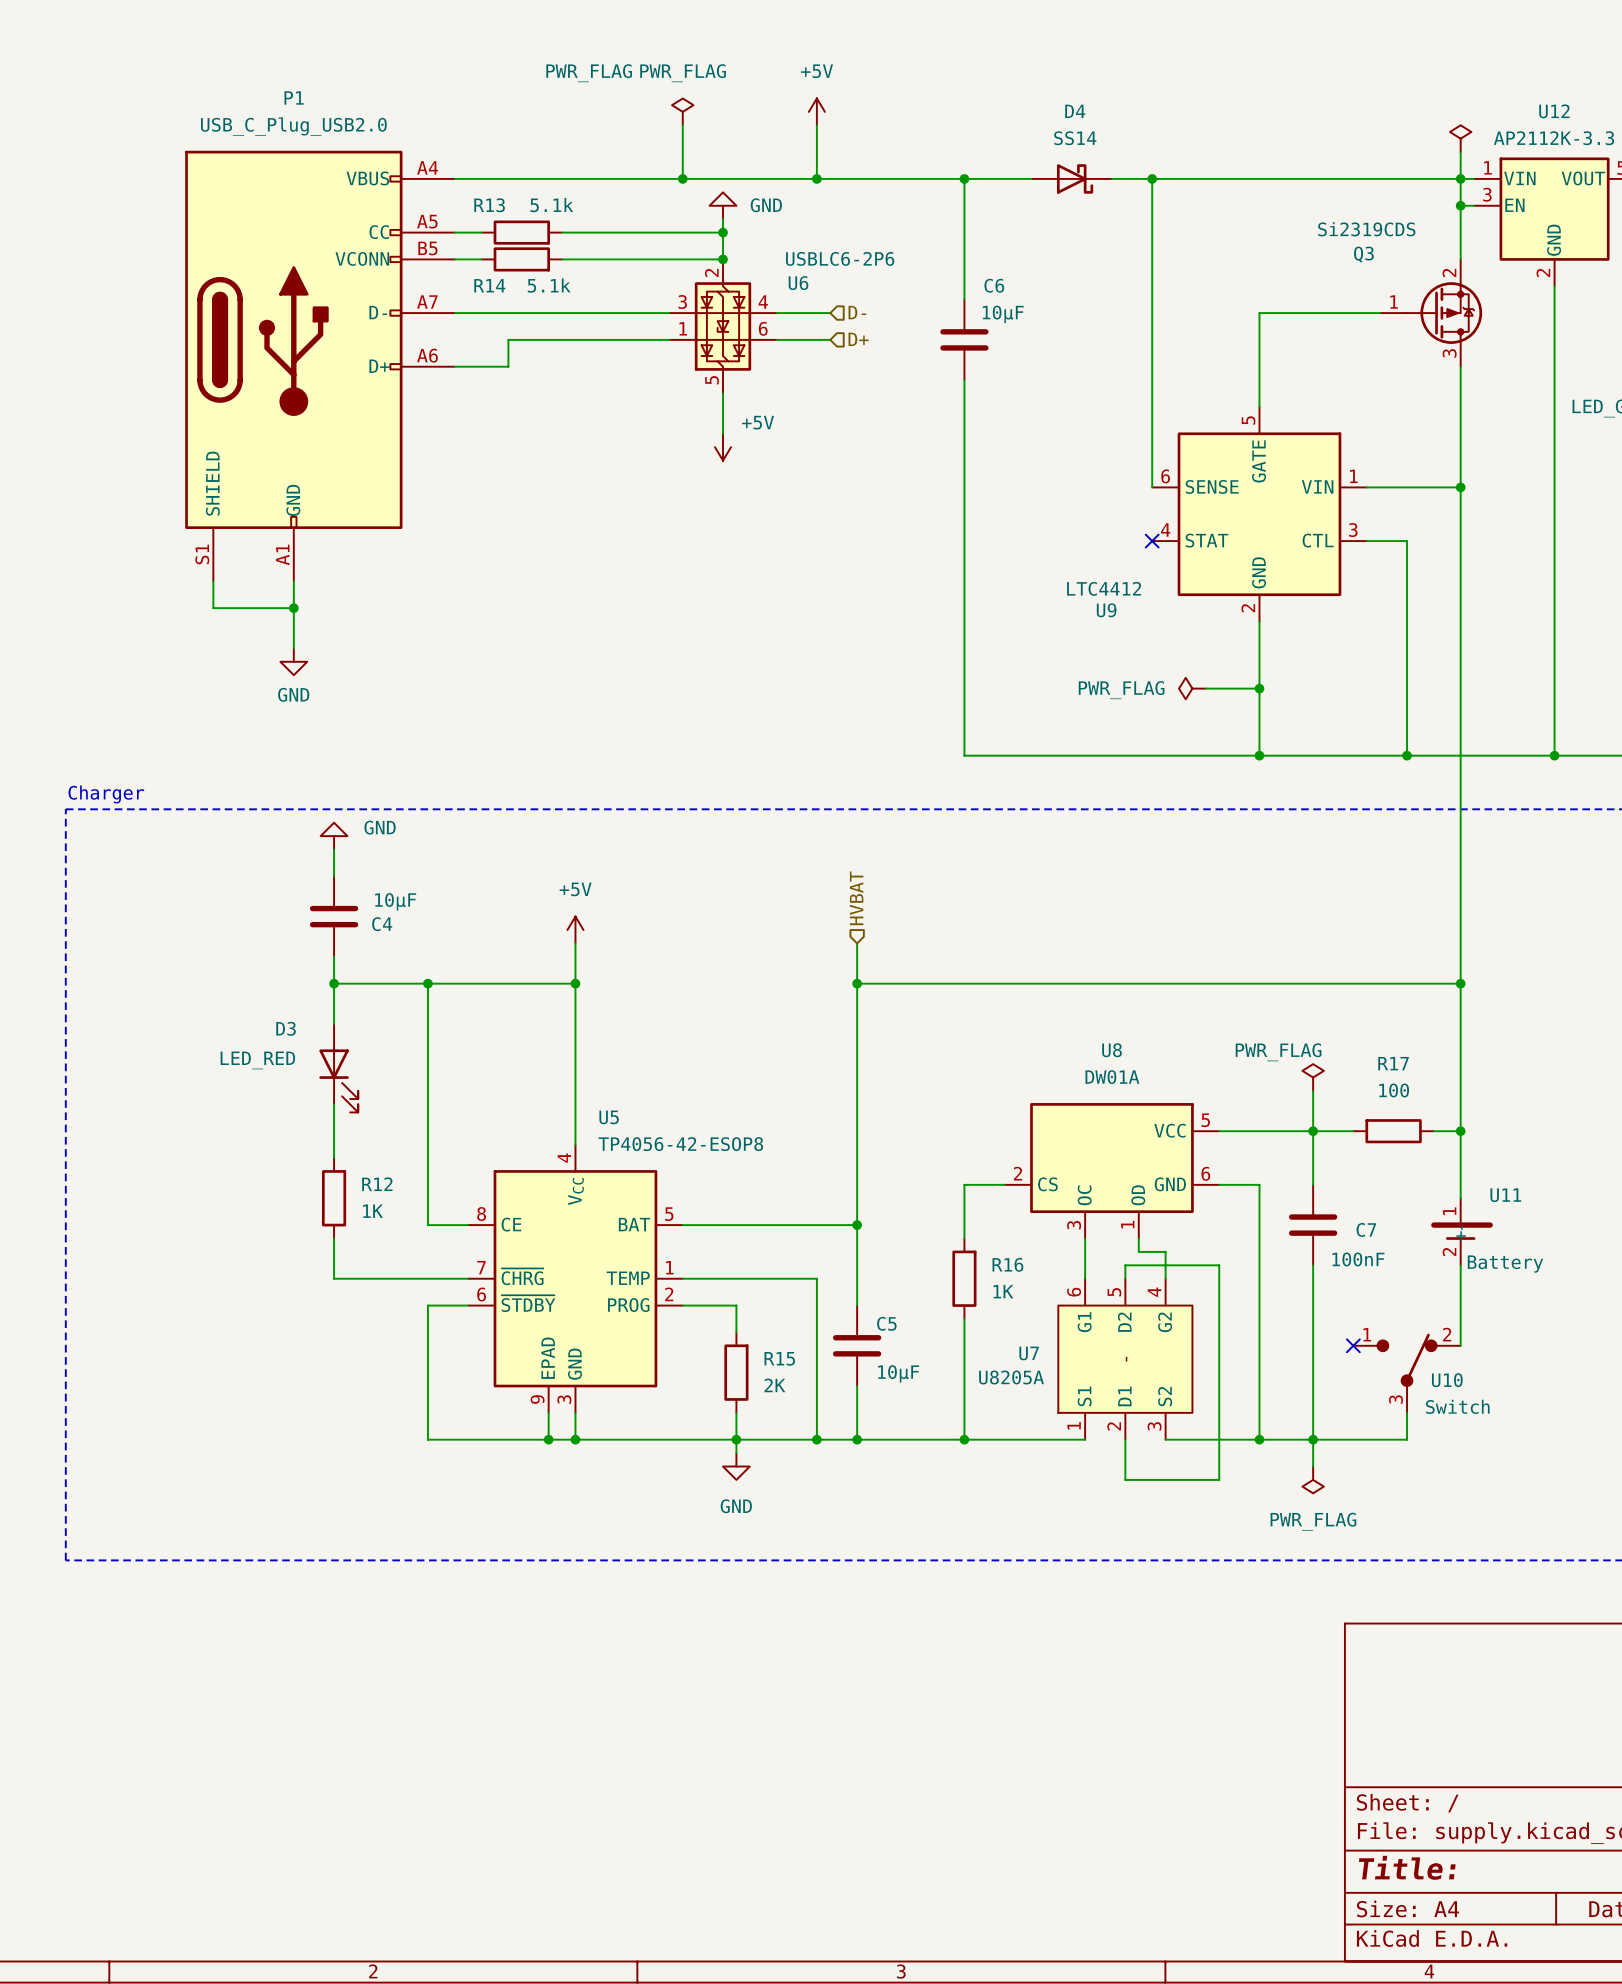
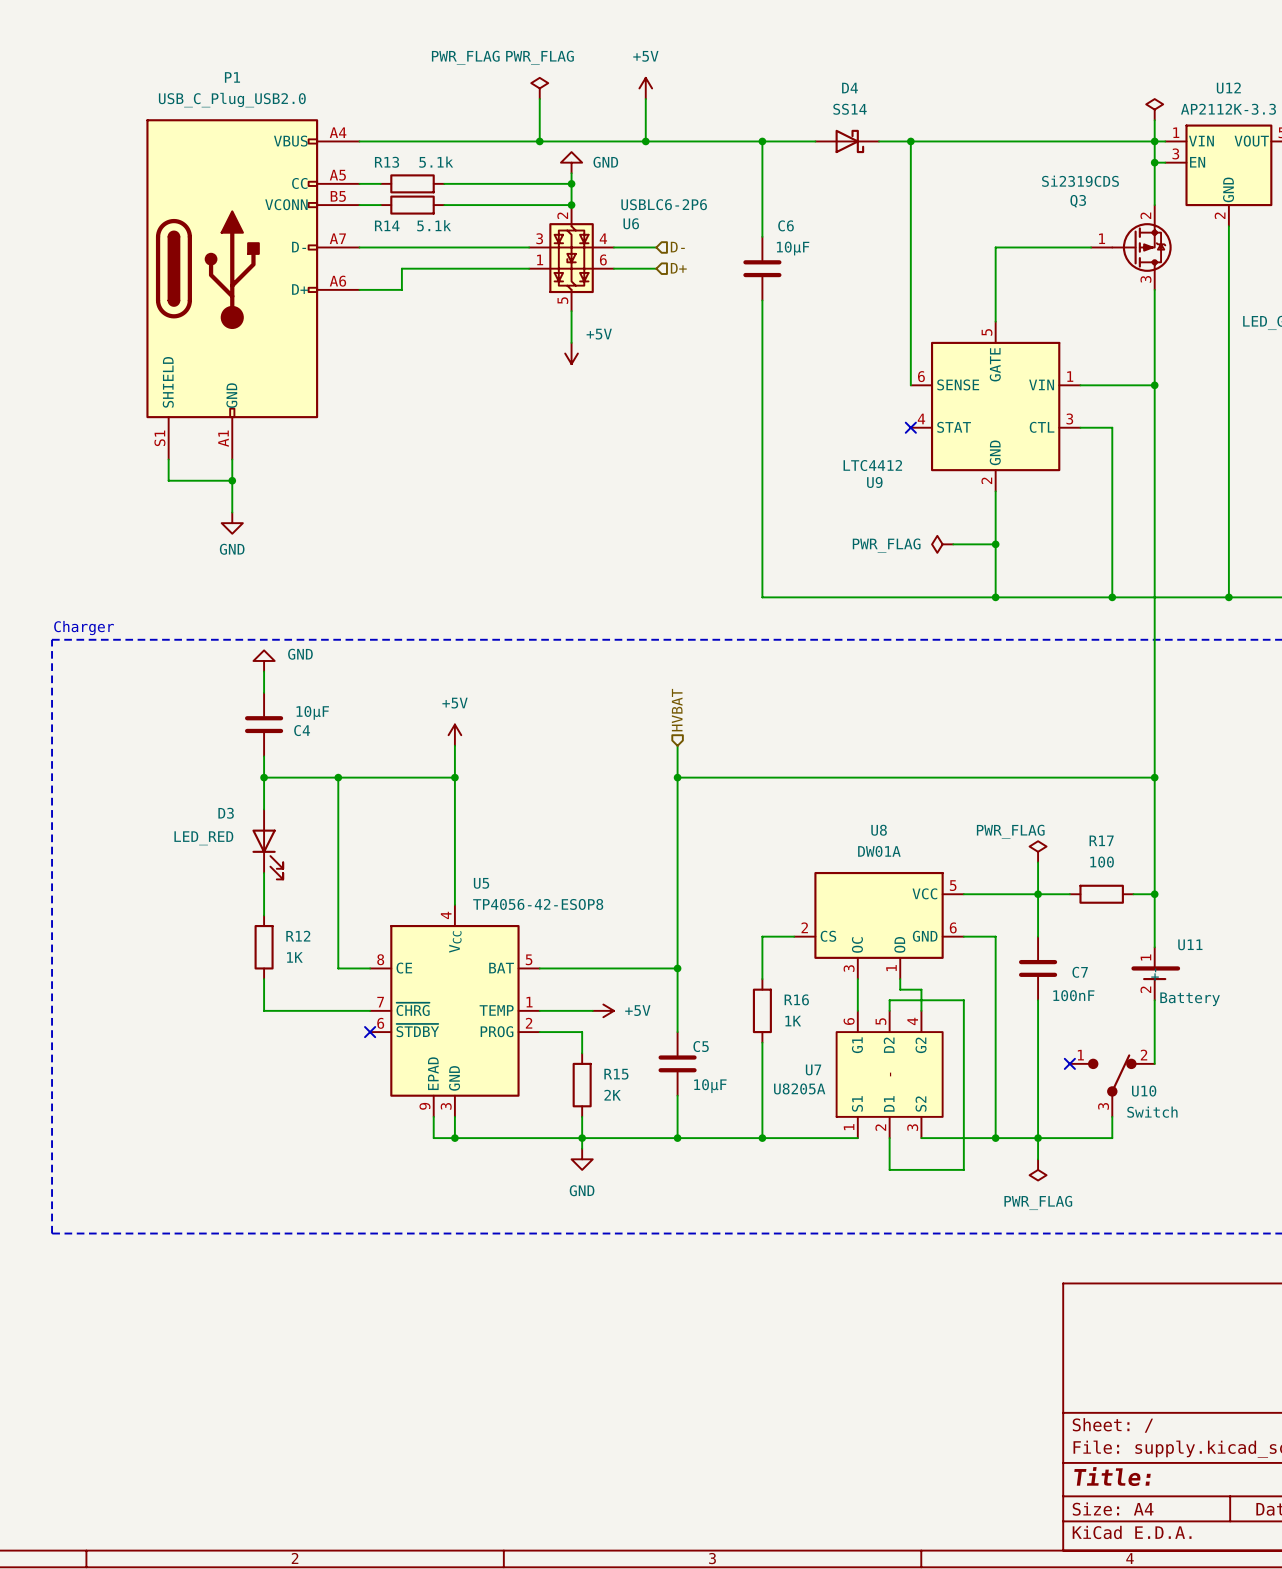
wire: (749, 1278) (816, 1278) (816, 1439) -> none
power symbol: none -> +5V (603, 1010)
wire: (468, 1305) (427, 1305) (427, 1439) (548, 1439) -> none
no-connect mark: none -> (370, 1032)
junction: (548, 1439) -> none
junction: (816, 1439) -> none

